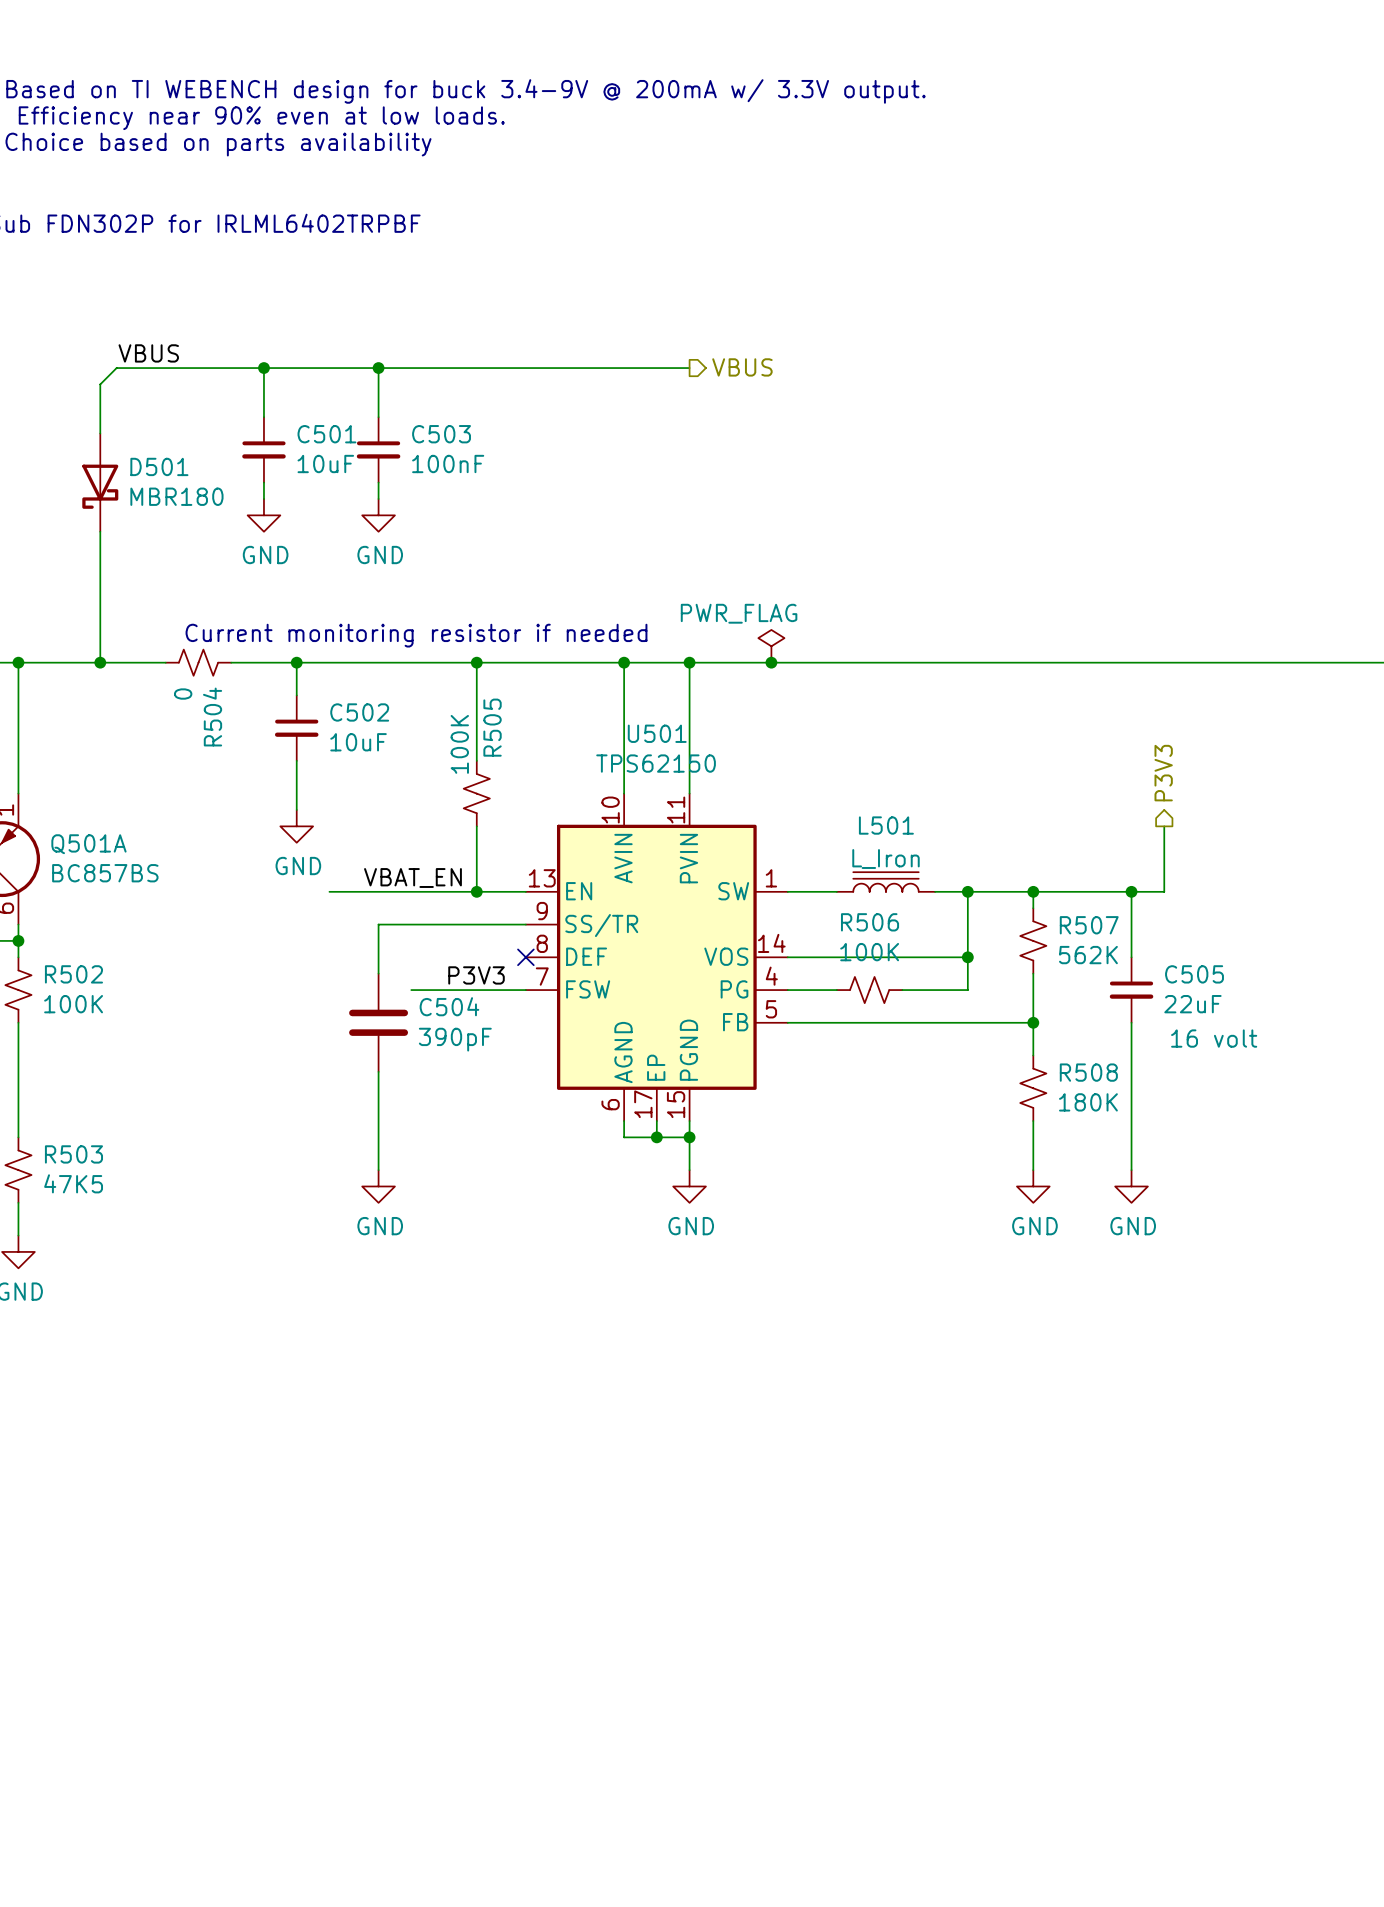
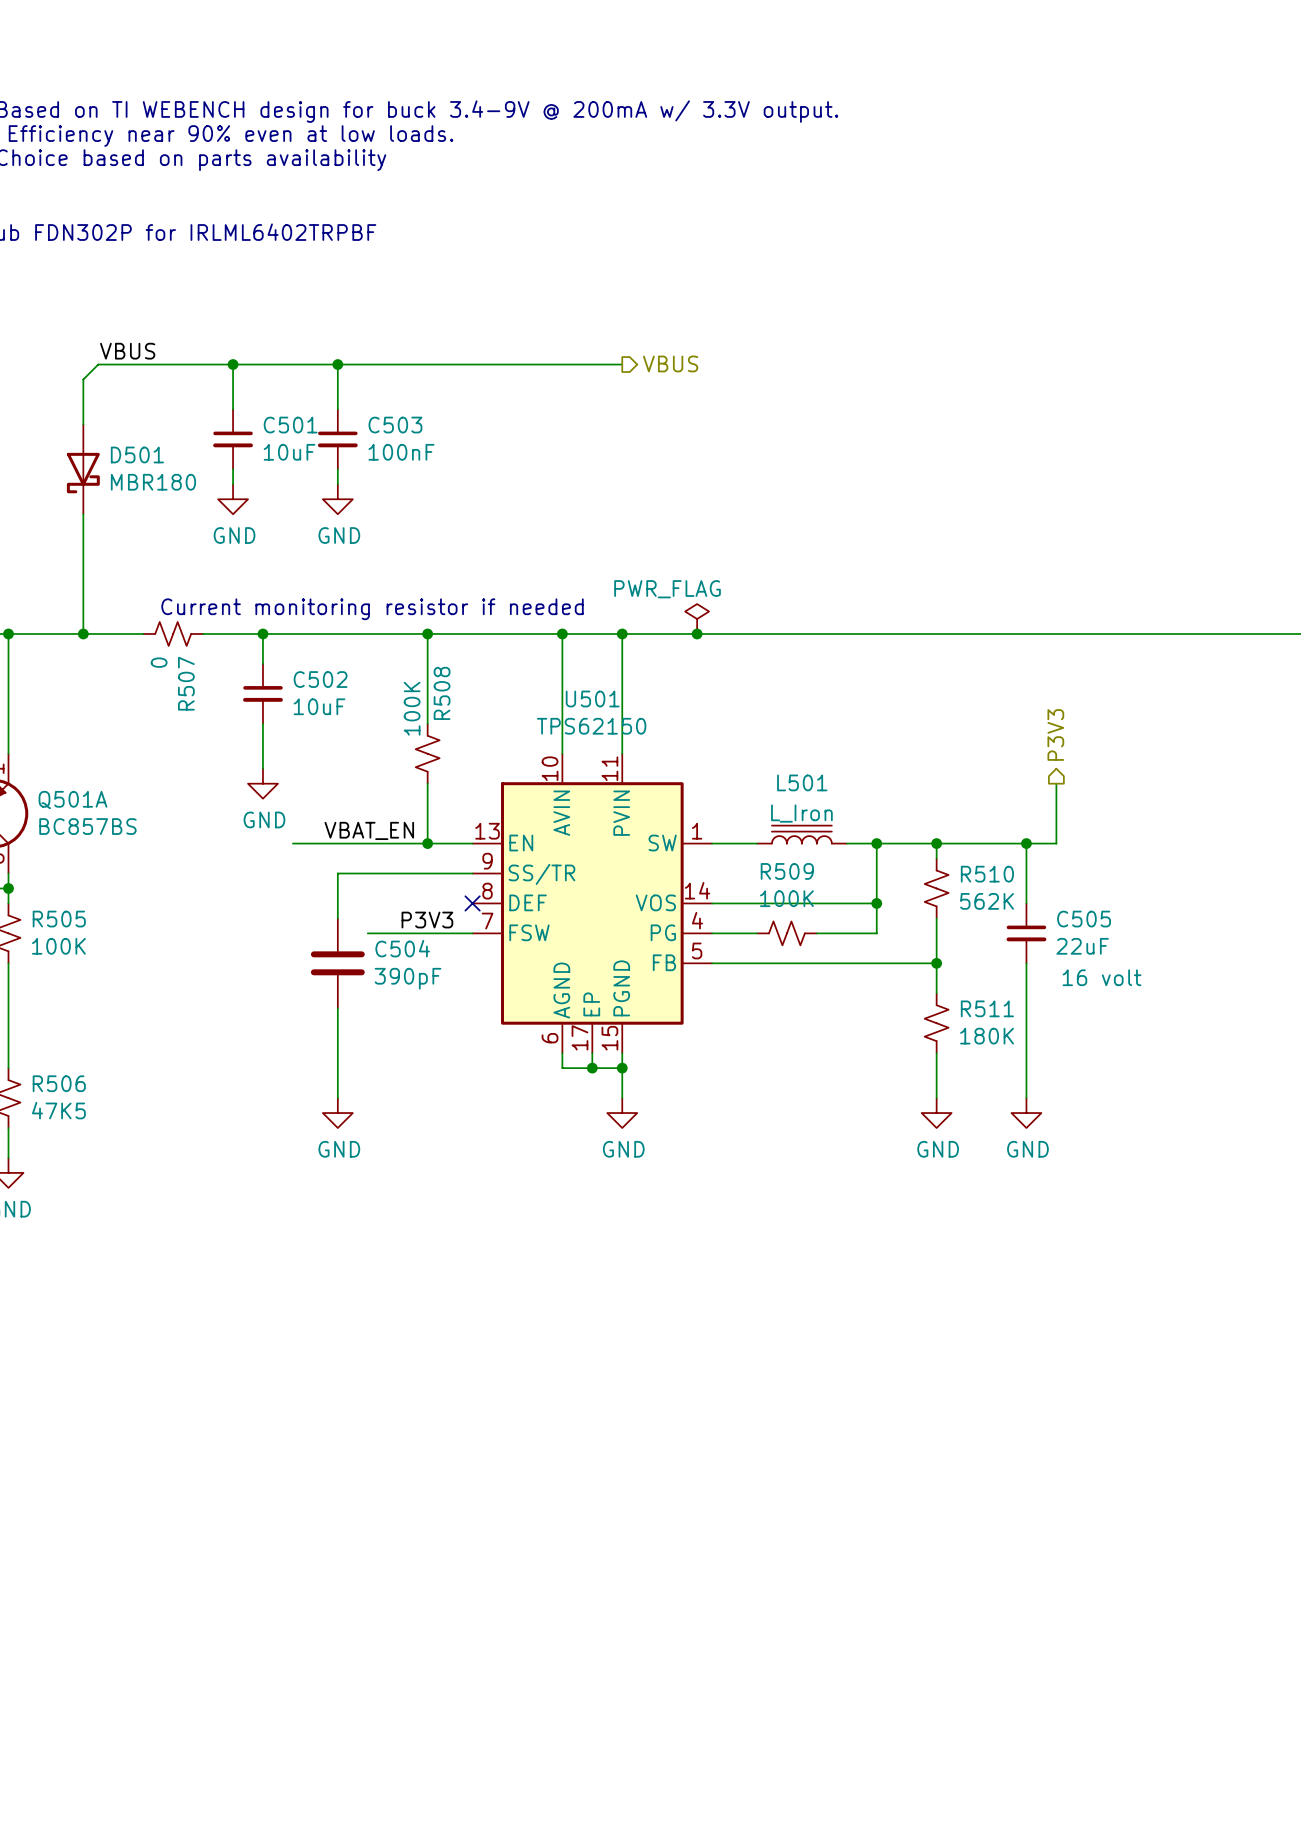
R504 name: R504 (212, 717) -> R507 (186, 683)
R505 name: R505 (492, 727) -> R508 (442, 693)
R506 name: R506 (870, 922) -> R509 (787, 871)
R507 name: R507 (1089, 925) -> R510 (987, 874)
R502 name: R502 (73, 974) -> R505 (59, 919)
R508 name: R508 (1088, 1072) -> R511 (987, 1008)
R503 name: R503 (73, 1154) -> R506 (59, 1083)

